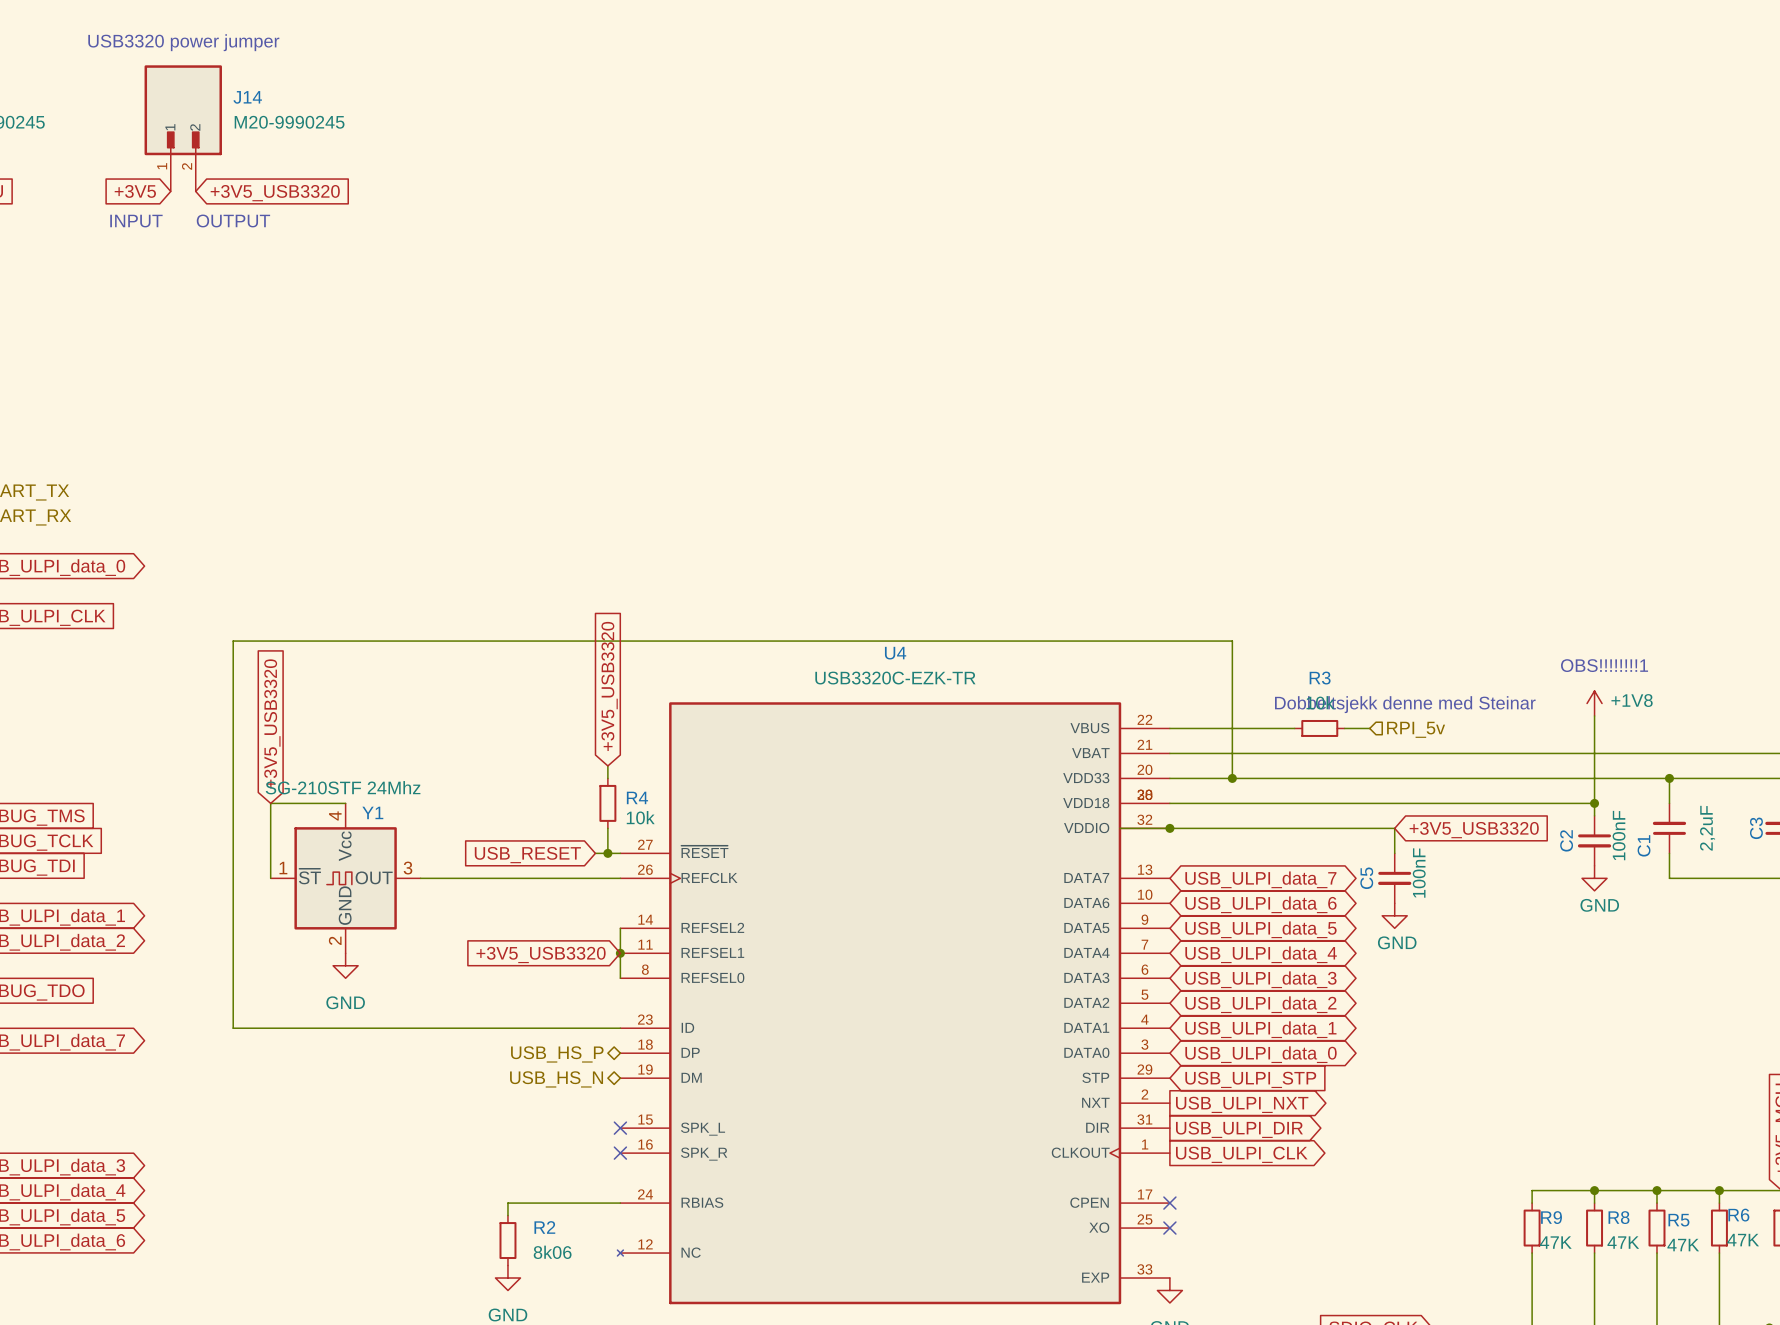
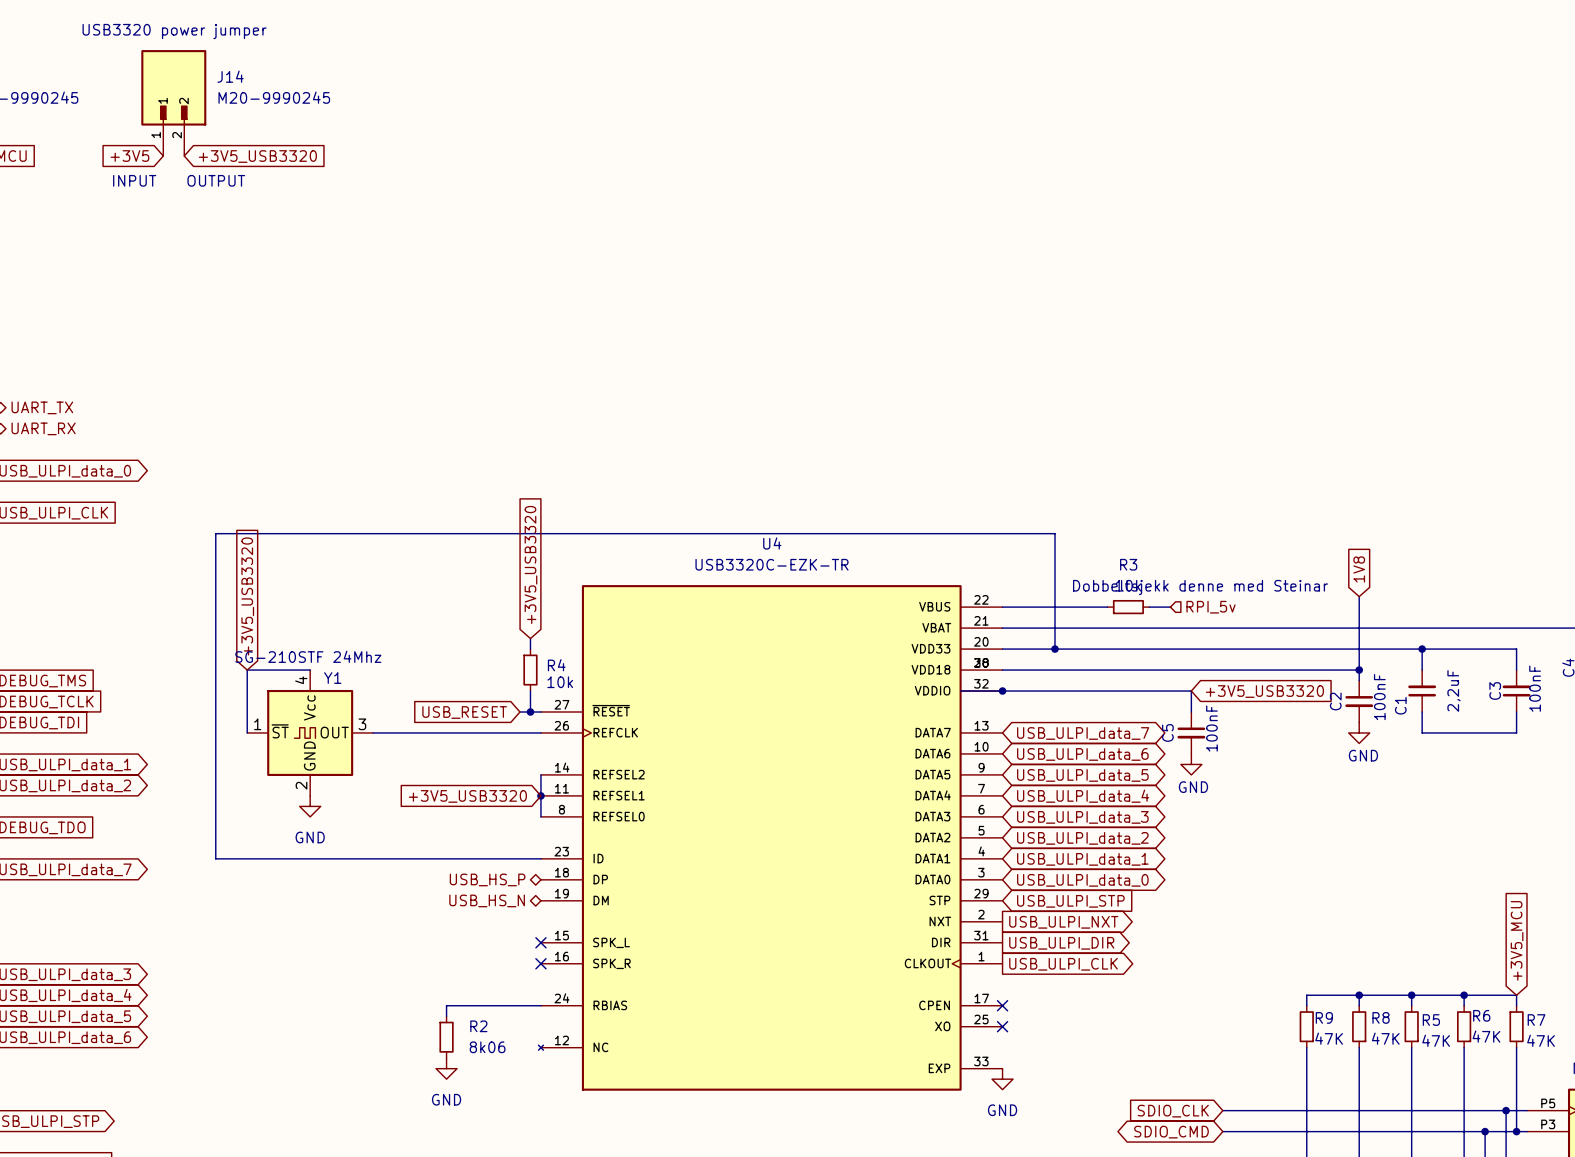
text: OBS!!!!!!!!1 (1604, 665) -> none
global label: none -> 1V8 (1359, 569)
power symbol: +1V8 (1594, 703) -> none

